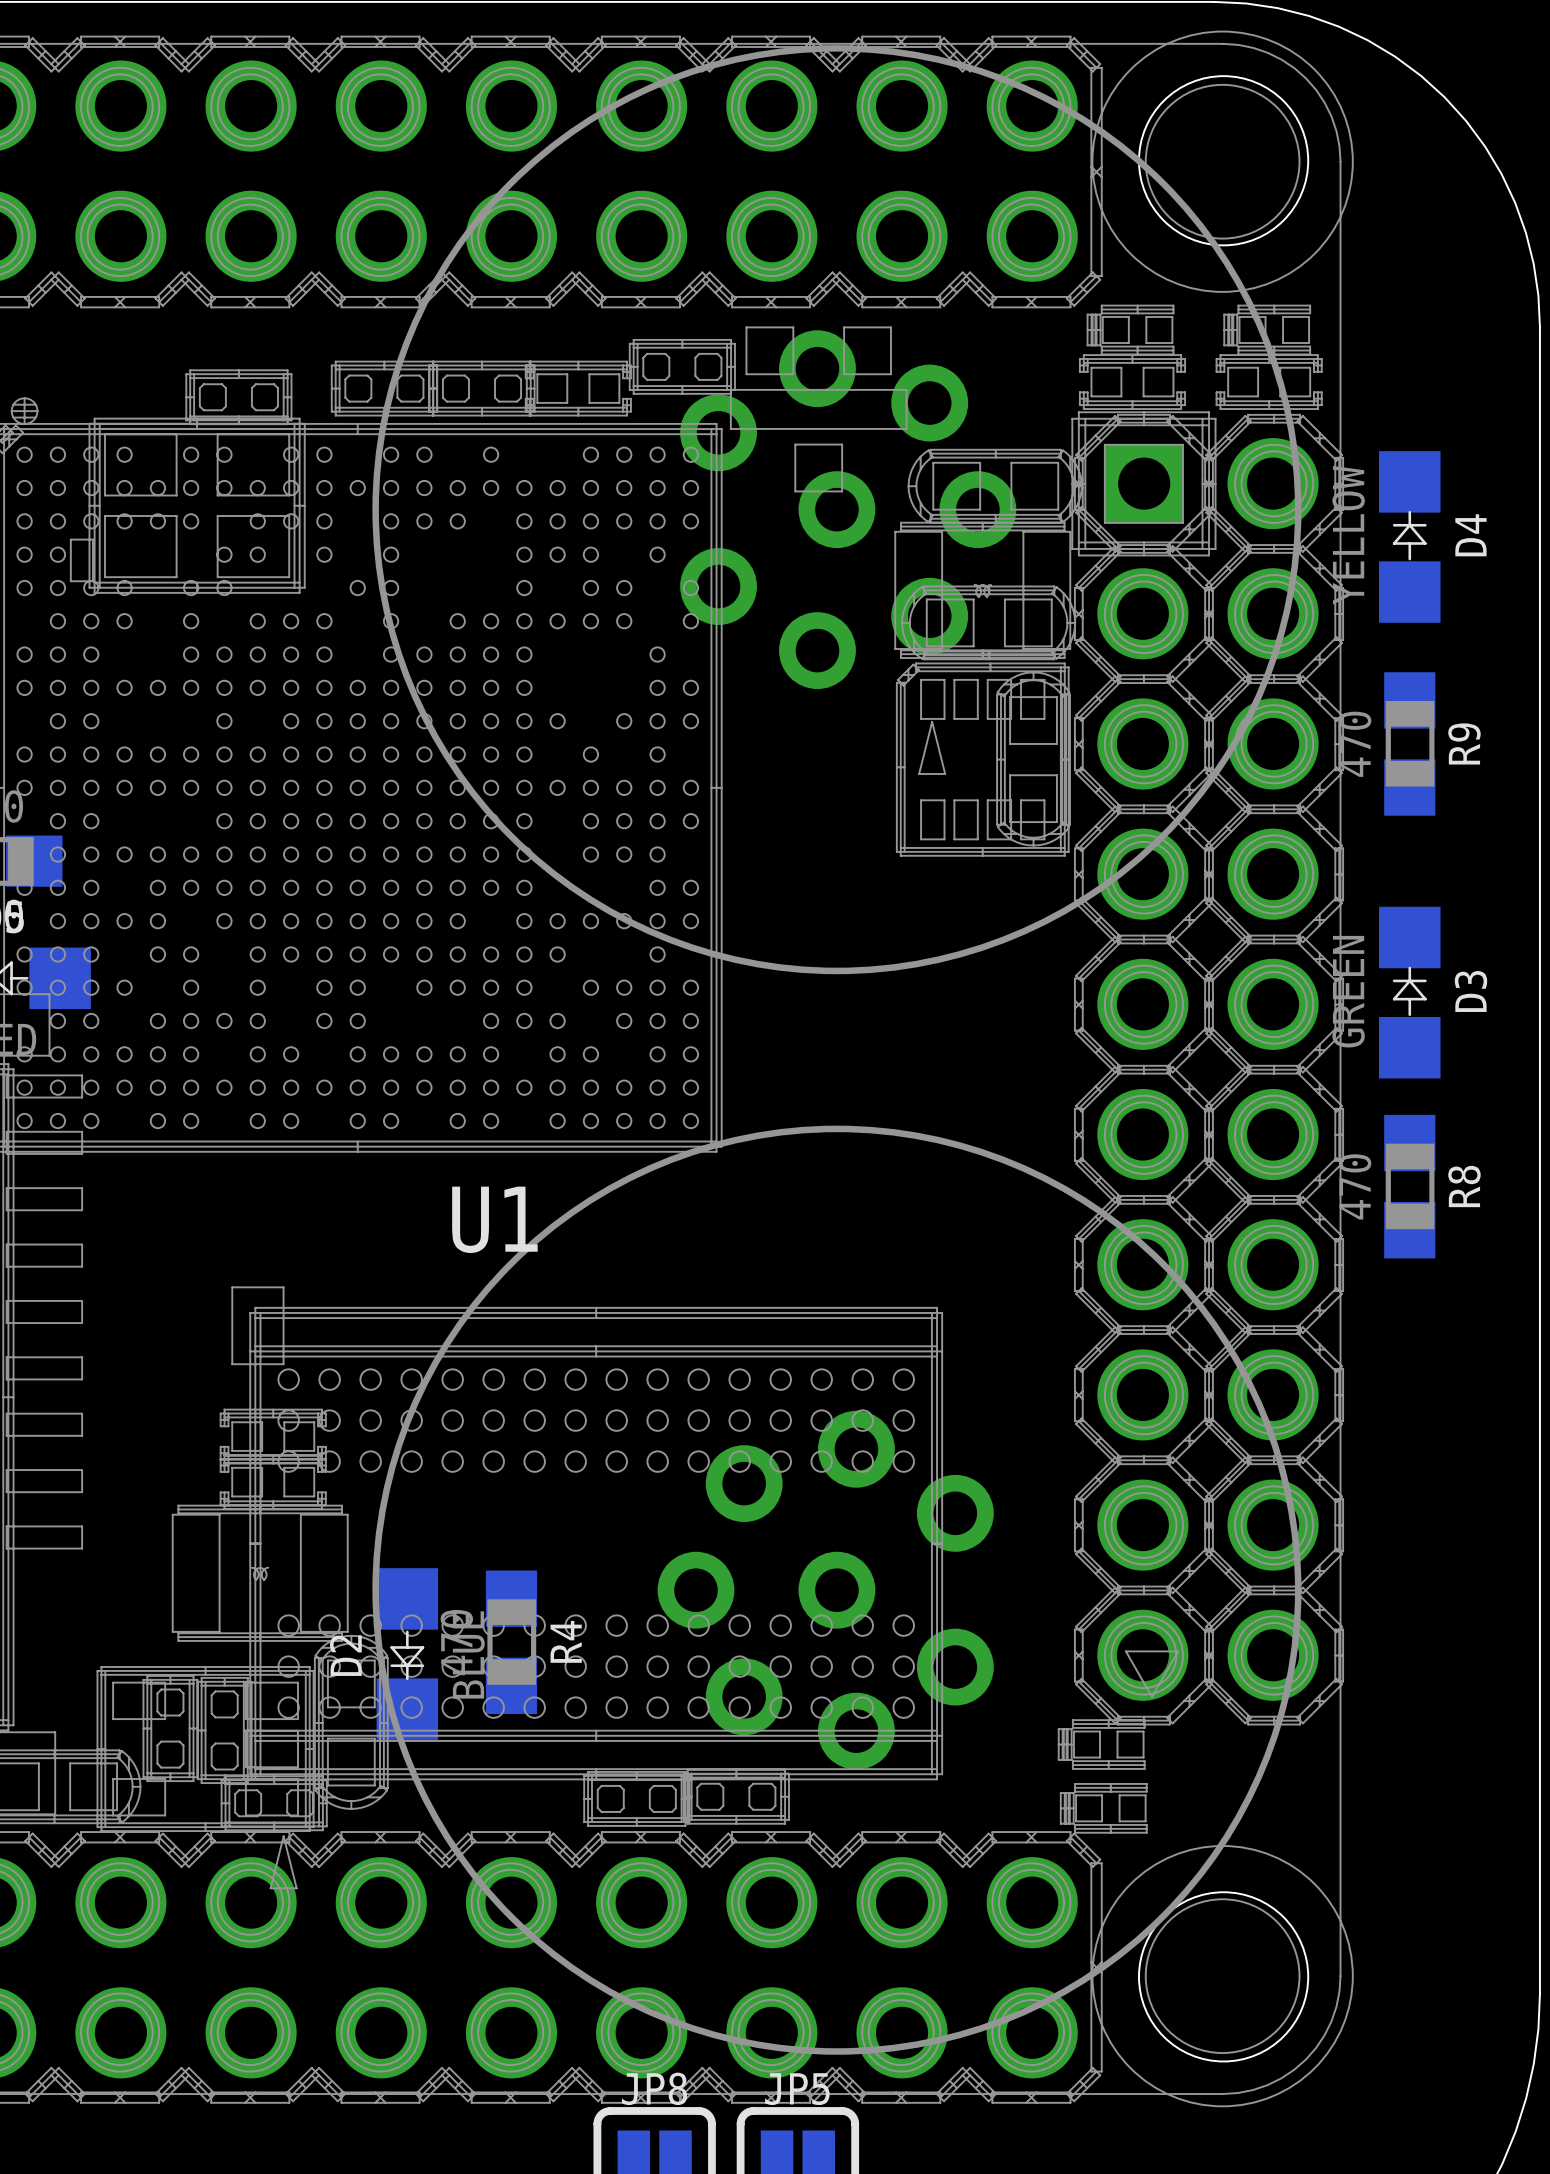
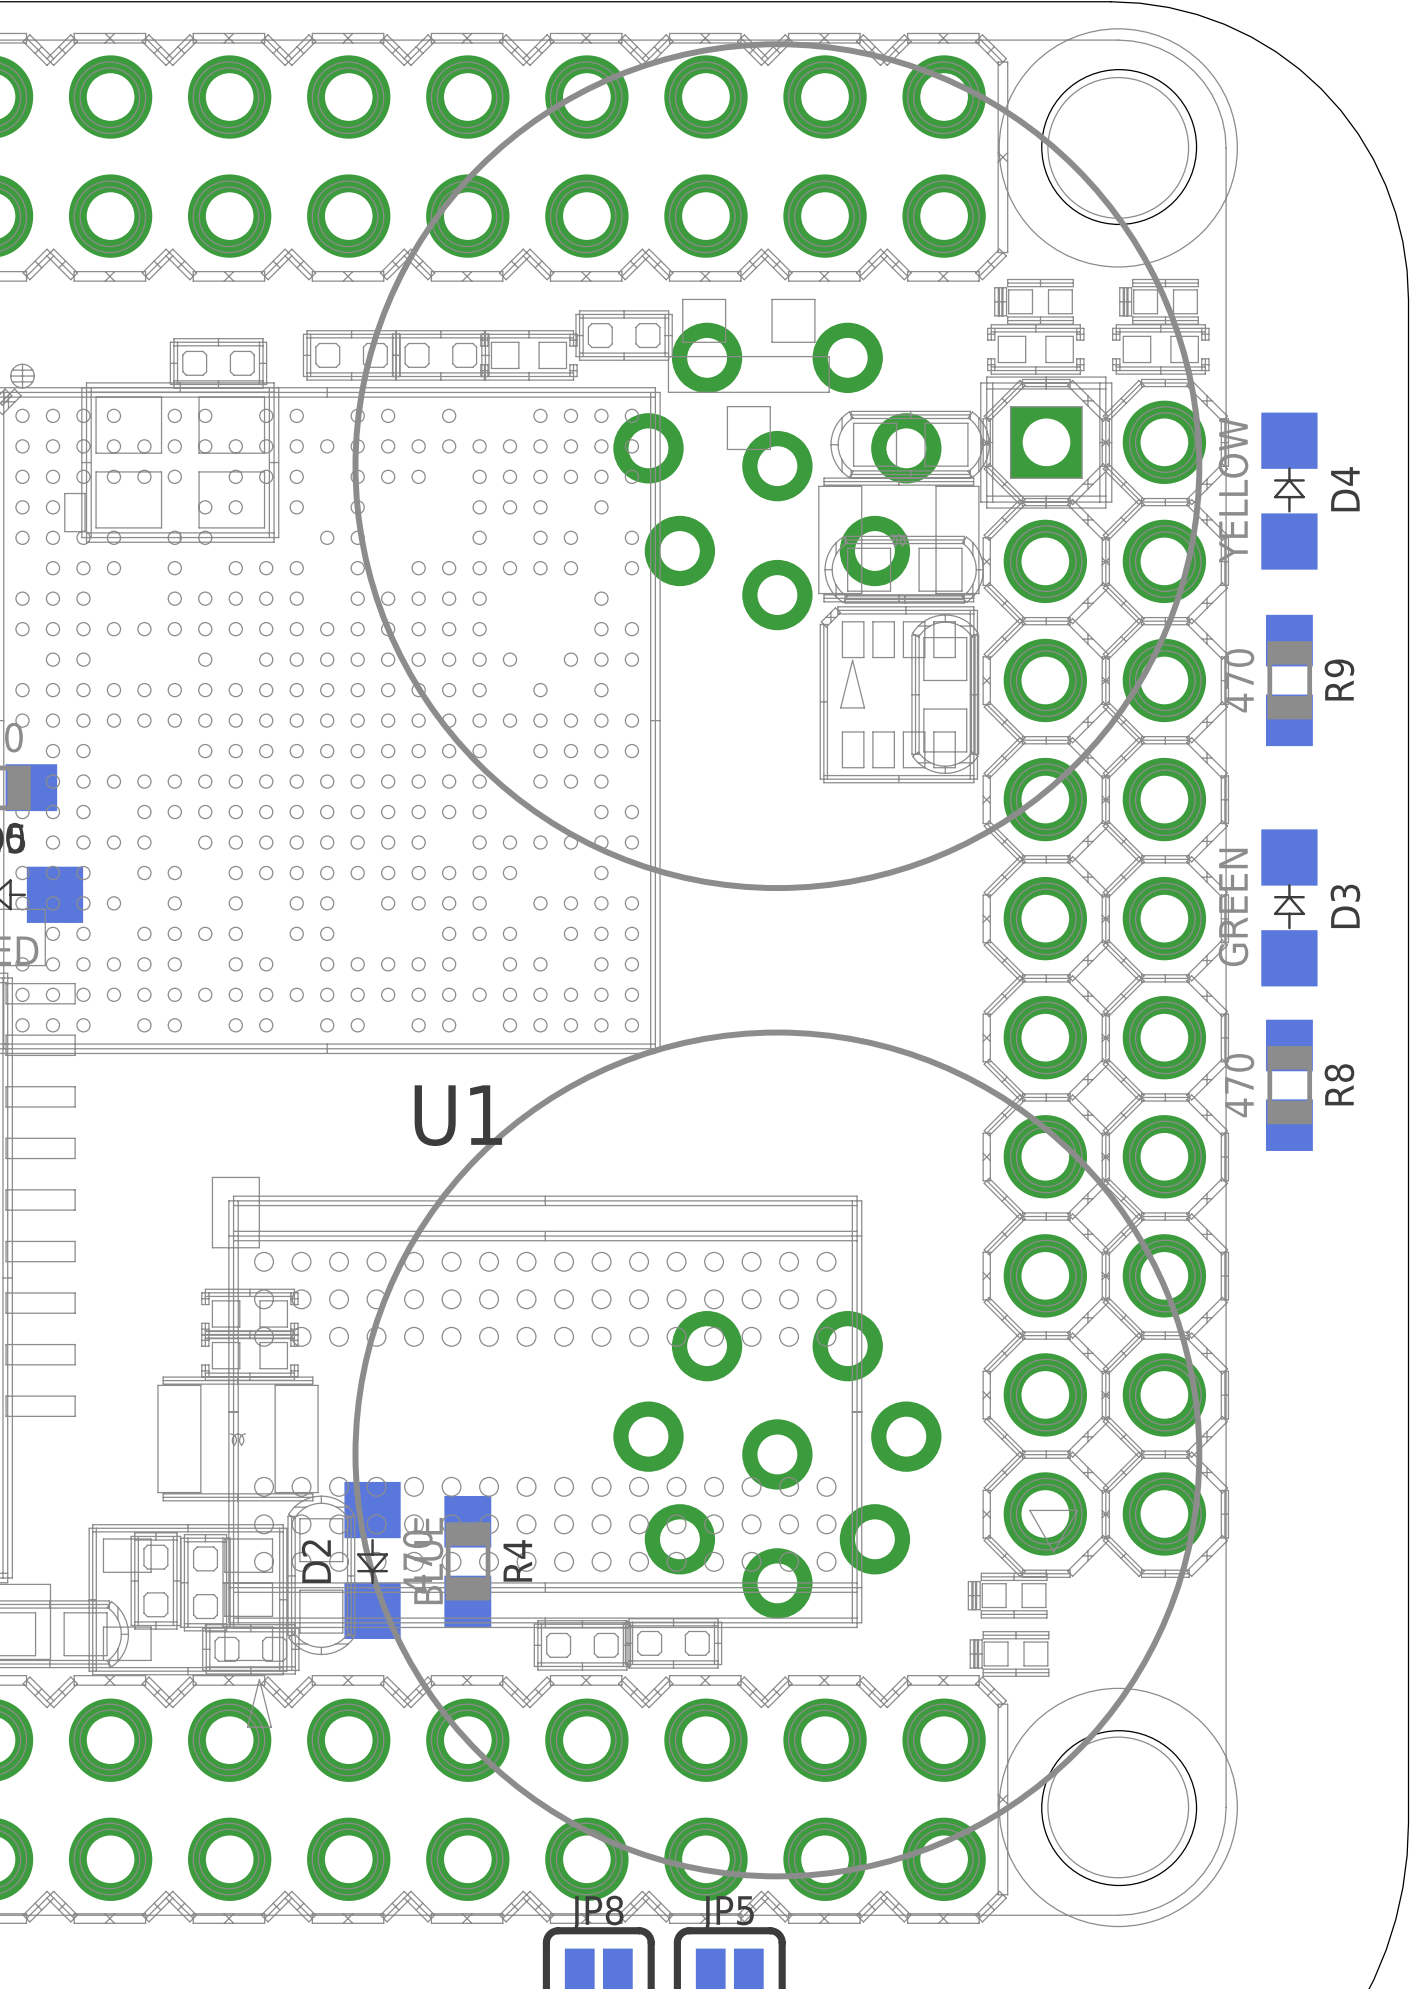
part rotation: 0° (836, 509) -> 90° clockwise (777, 466)
part rotation: 0° (836, 1590) -> 90° counterclockwise (777, 1454)
R4 position: (511, 1642) -> (467, 1561)
D2 position: (407, 1654) -> (372, 1560)

